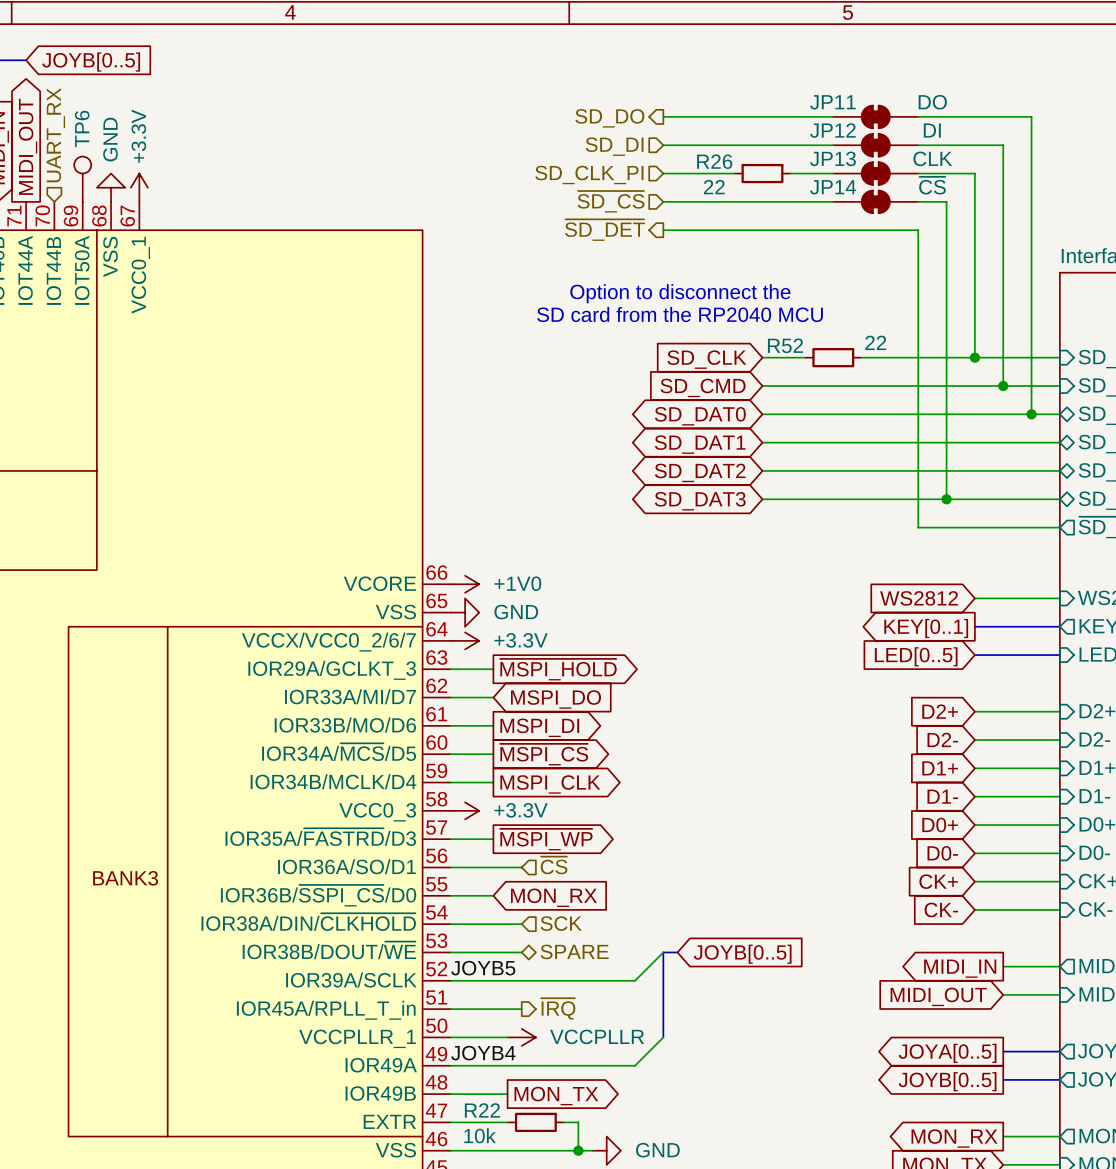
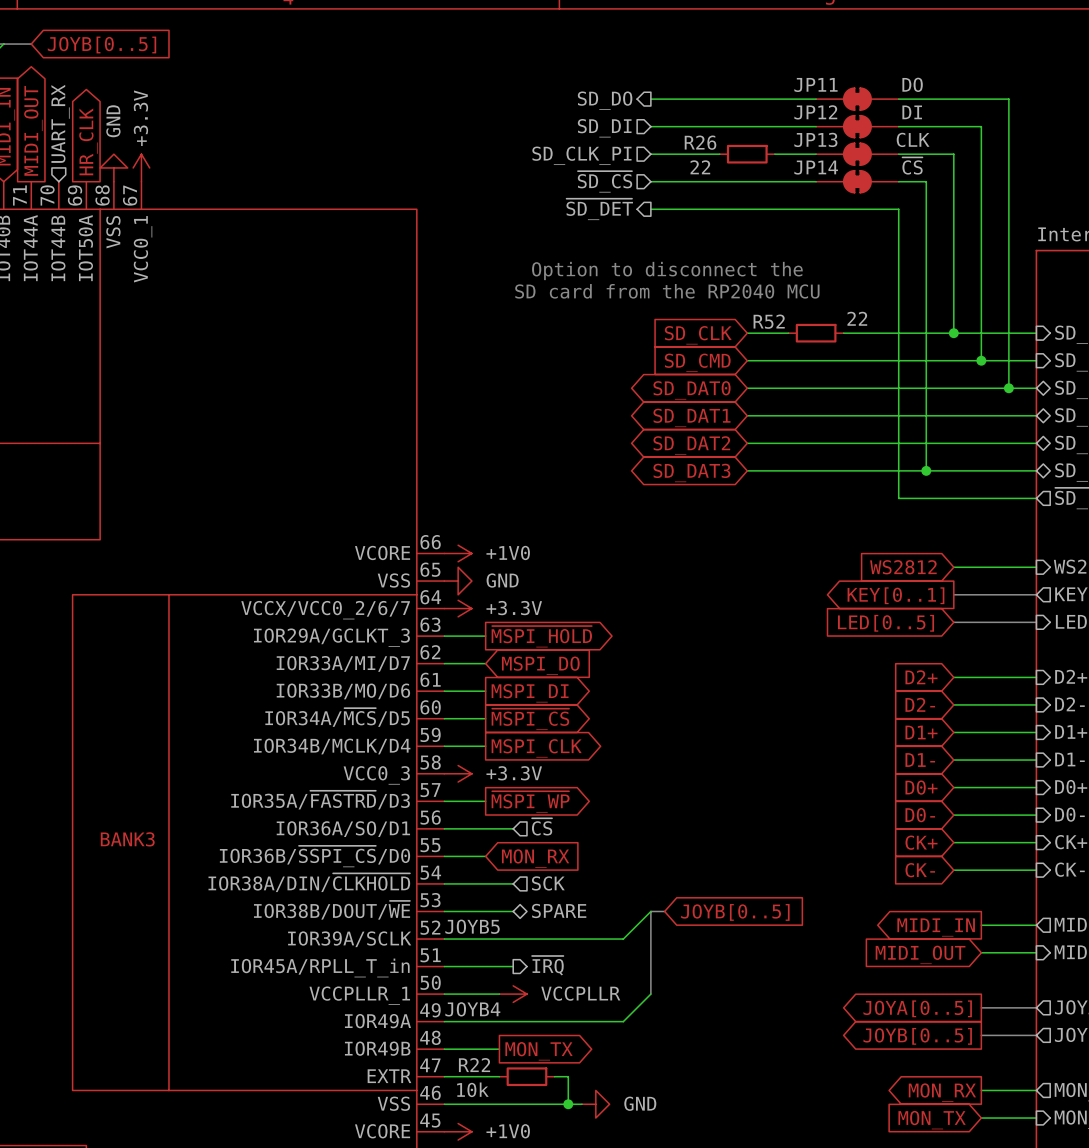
global label: none -> HR_CLK (88, 141)
TP6: (82, 179) -> none

